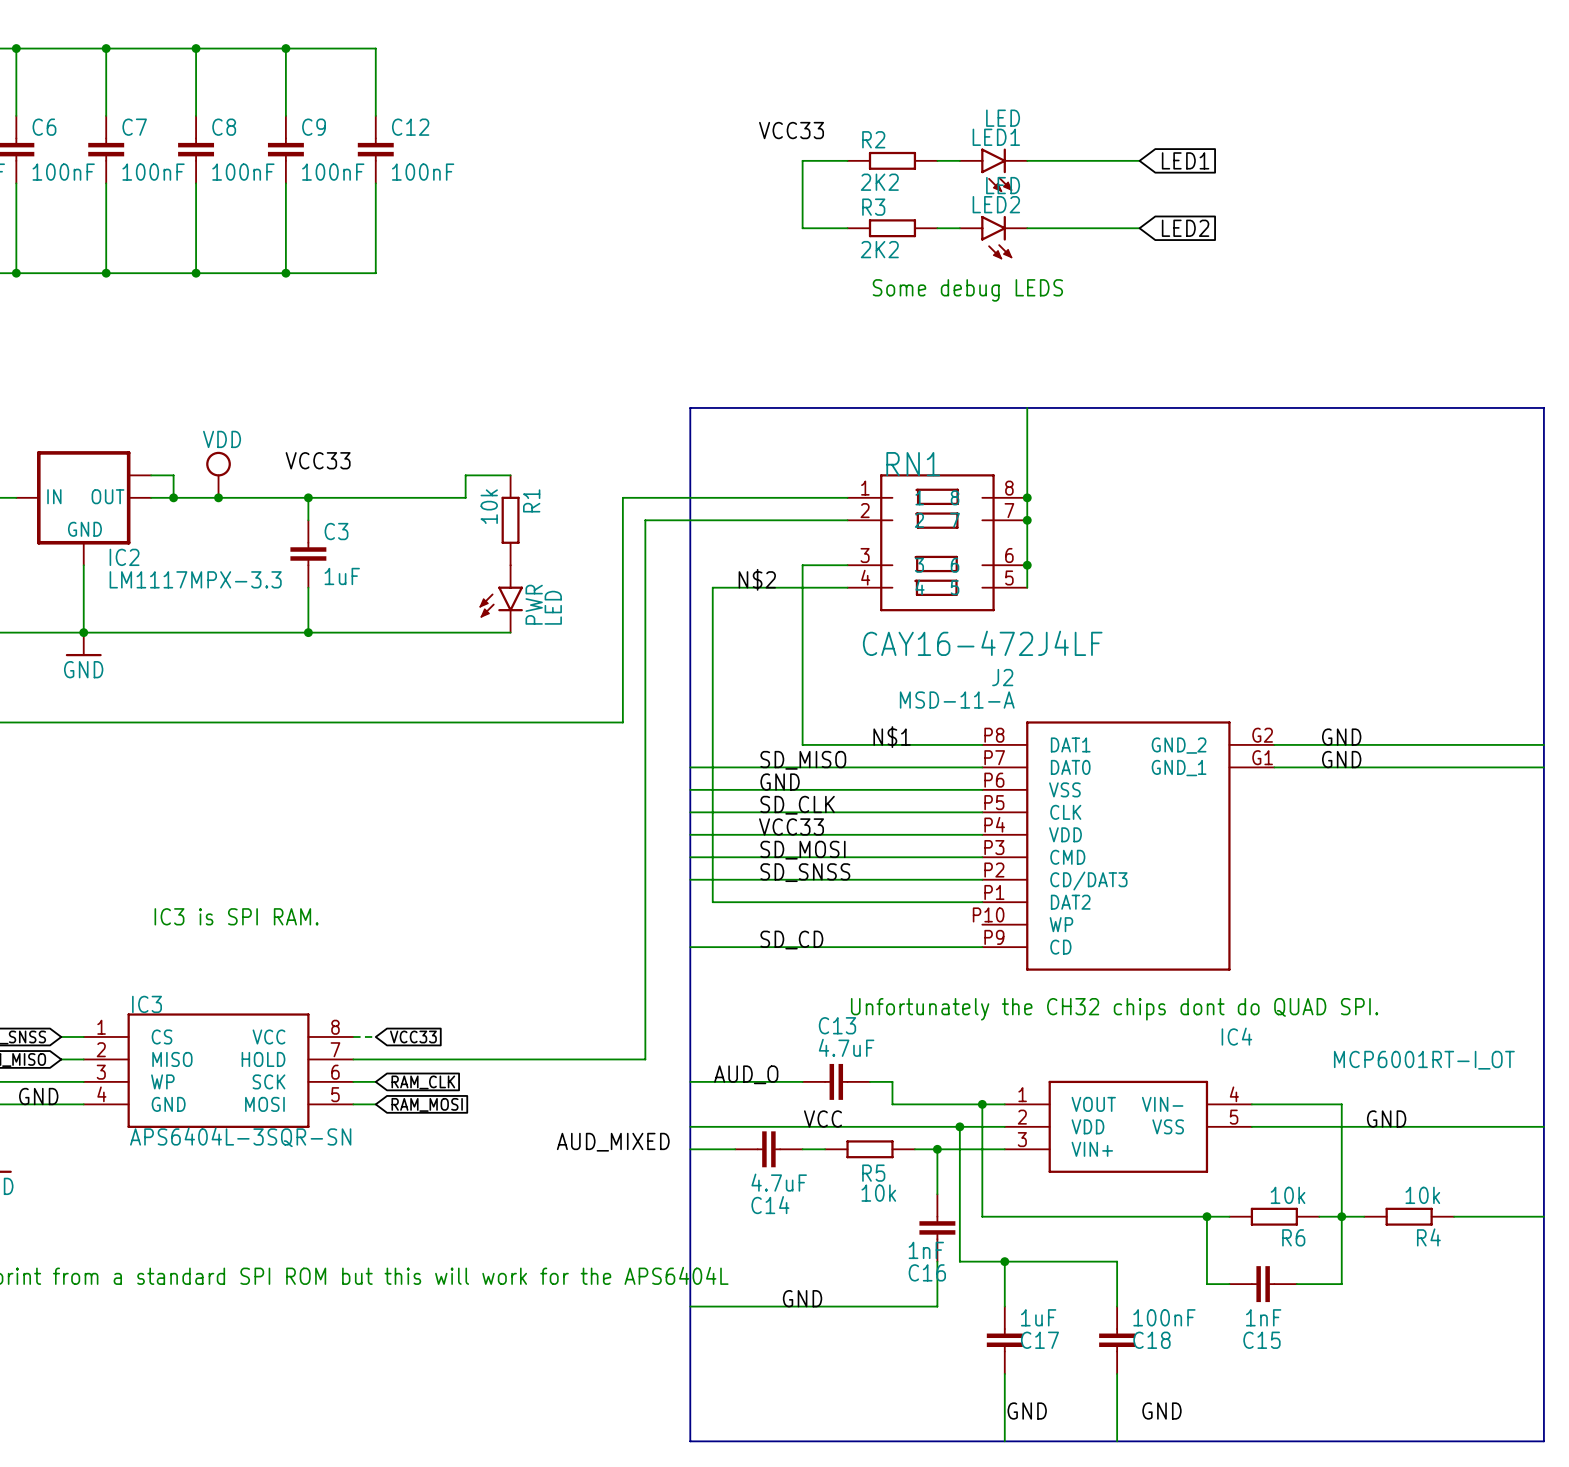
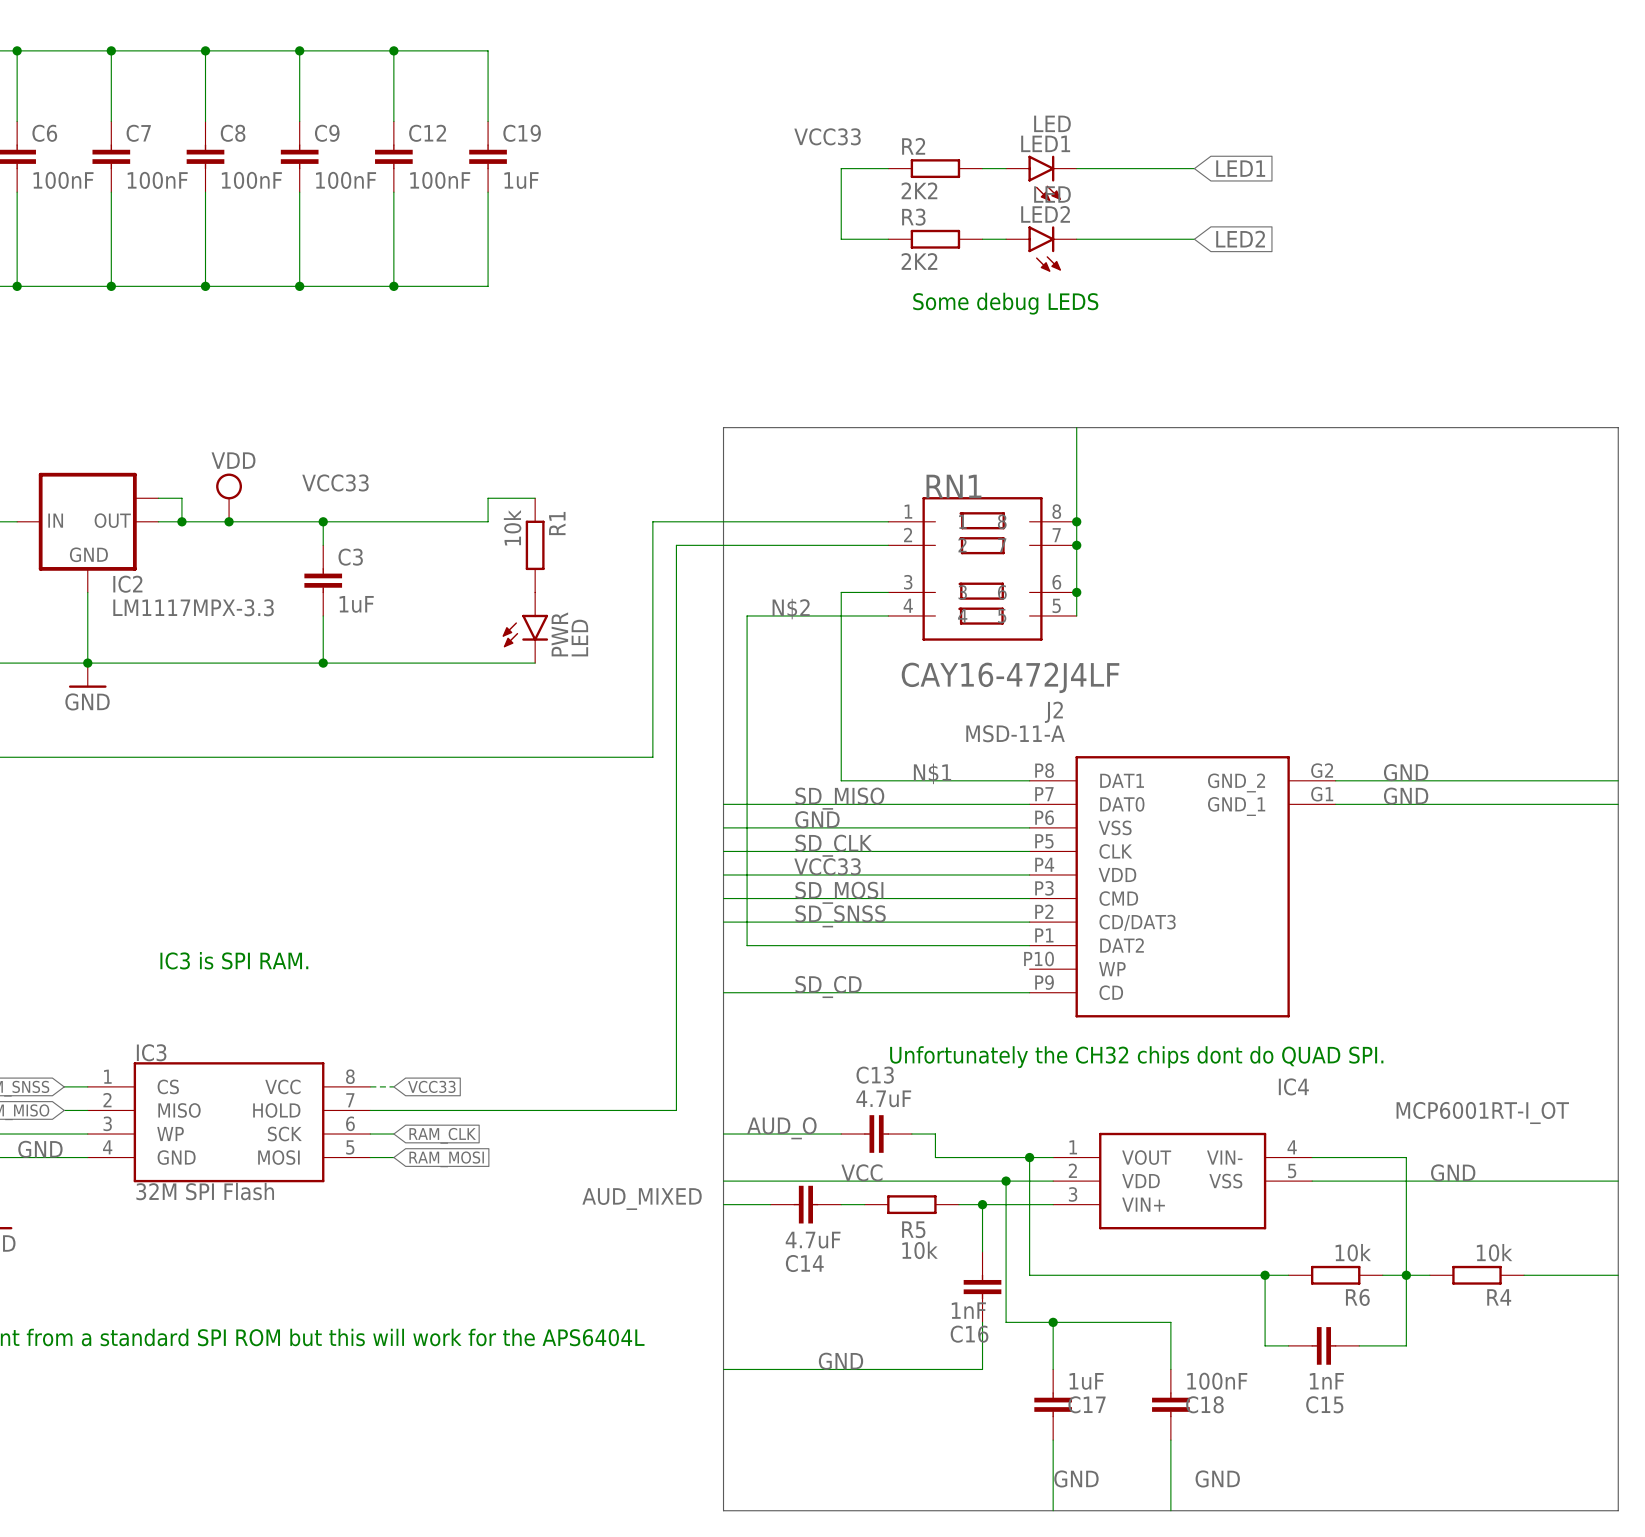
wire: none -> (393, 50) (488, 50) (488, 121)
junction: none -> (393, 50)
C19: none -> 1uF (488, 156)
wire: none -> (488, 192) (488, 286) (393, 286)
junction: none -> (393, 286)
IC3 value: APS6404L-3SQR-SN (240, 1137) -> 32M SPI Flash (205, 1191)

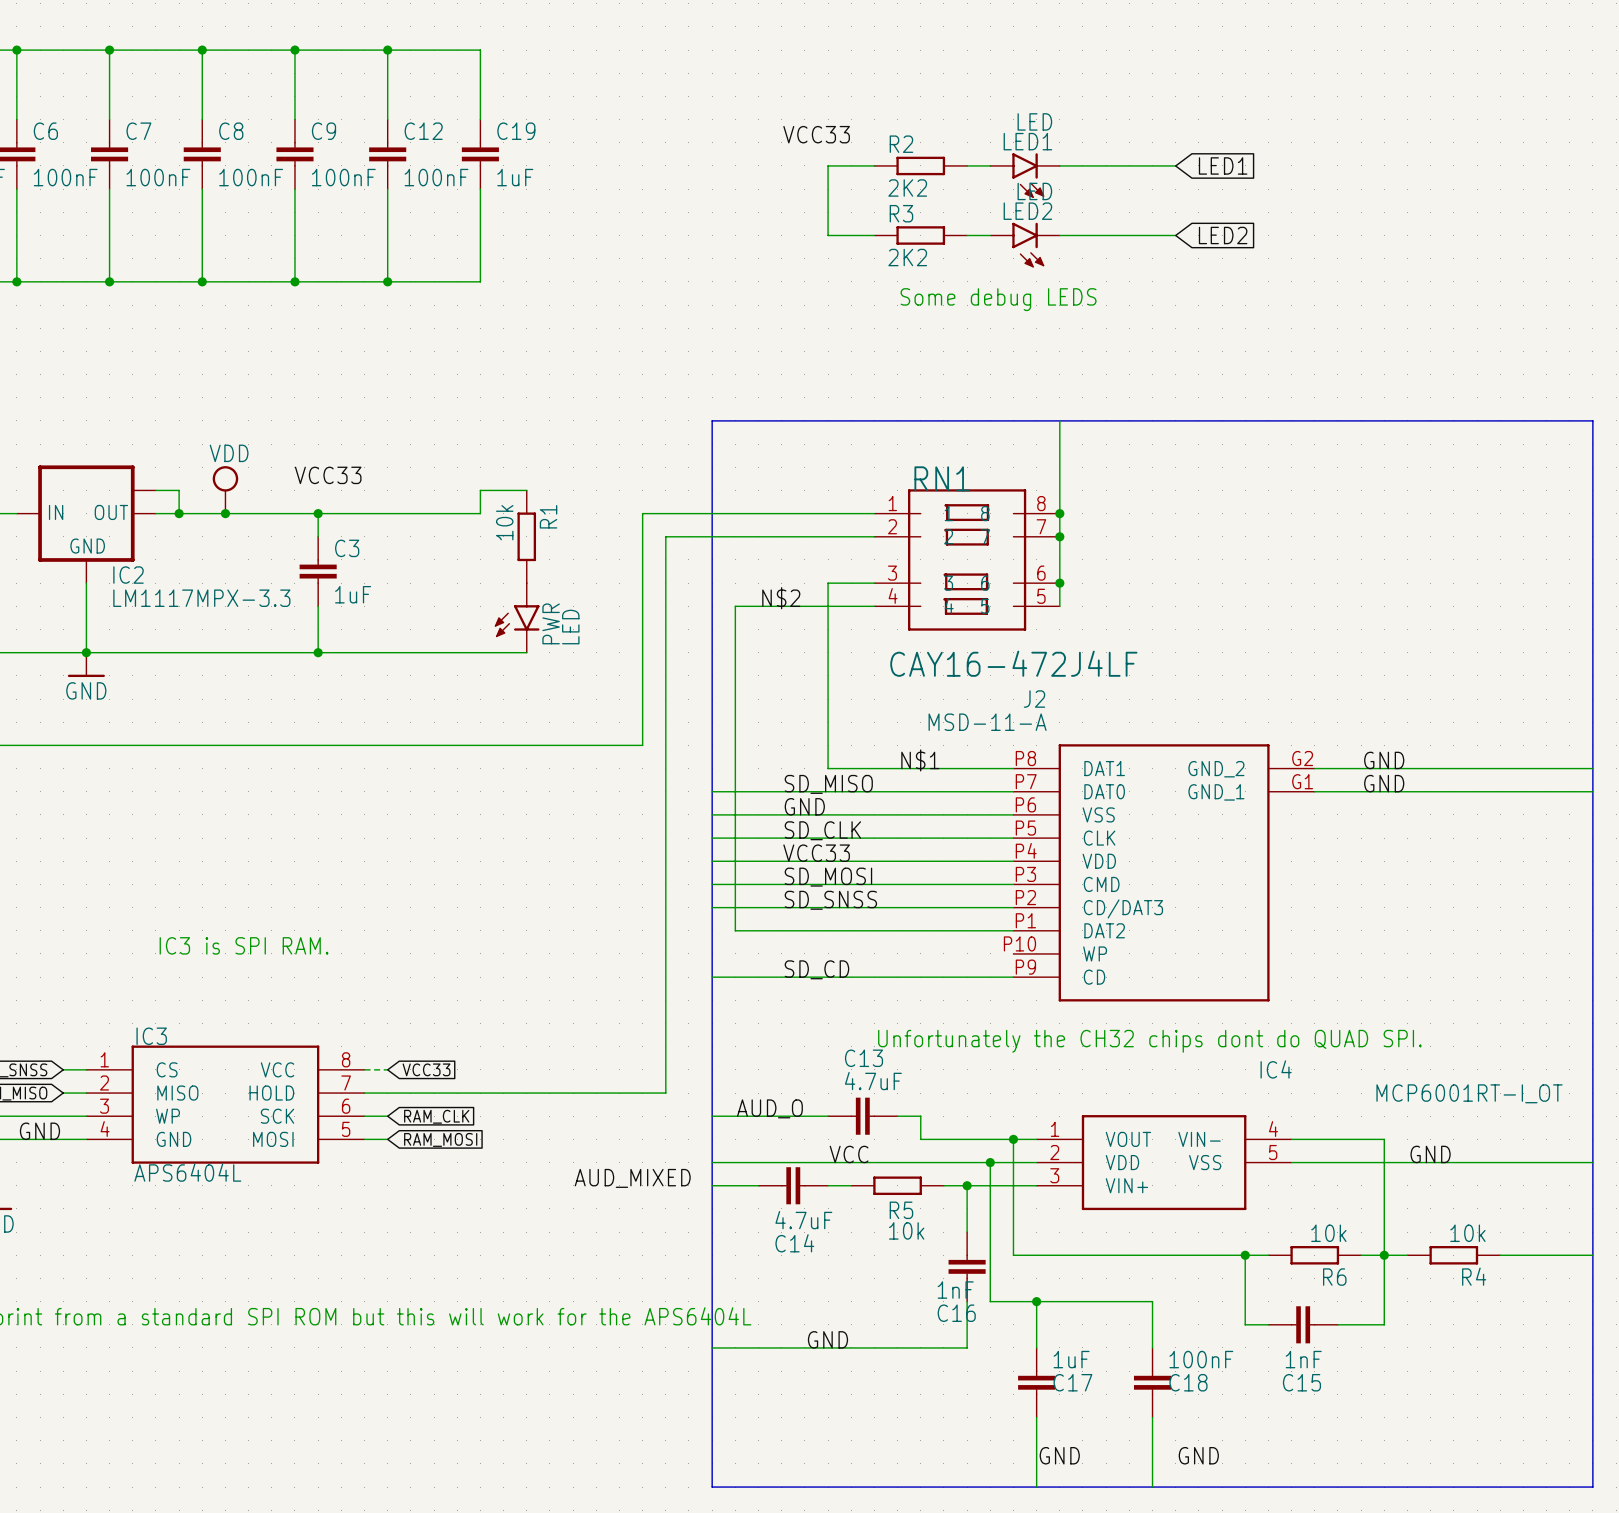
IC3 value: 32M SPI Flash (205, 1191) -> APS6404L (187, 1172)

